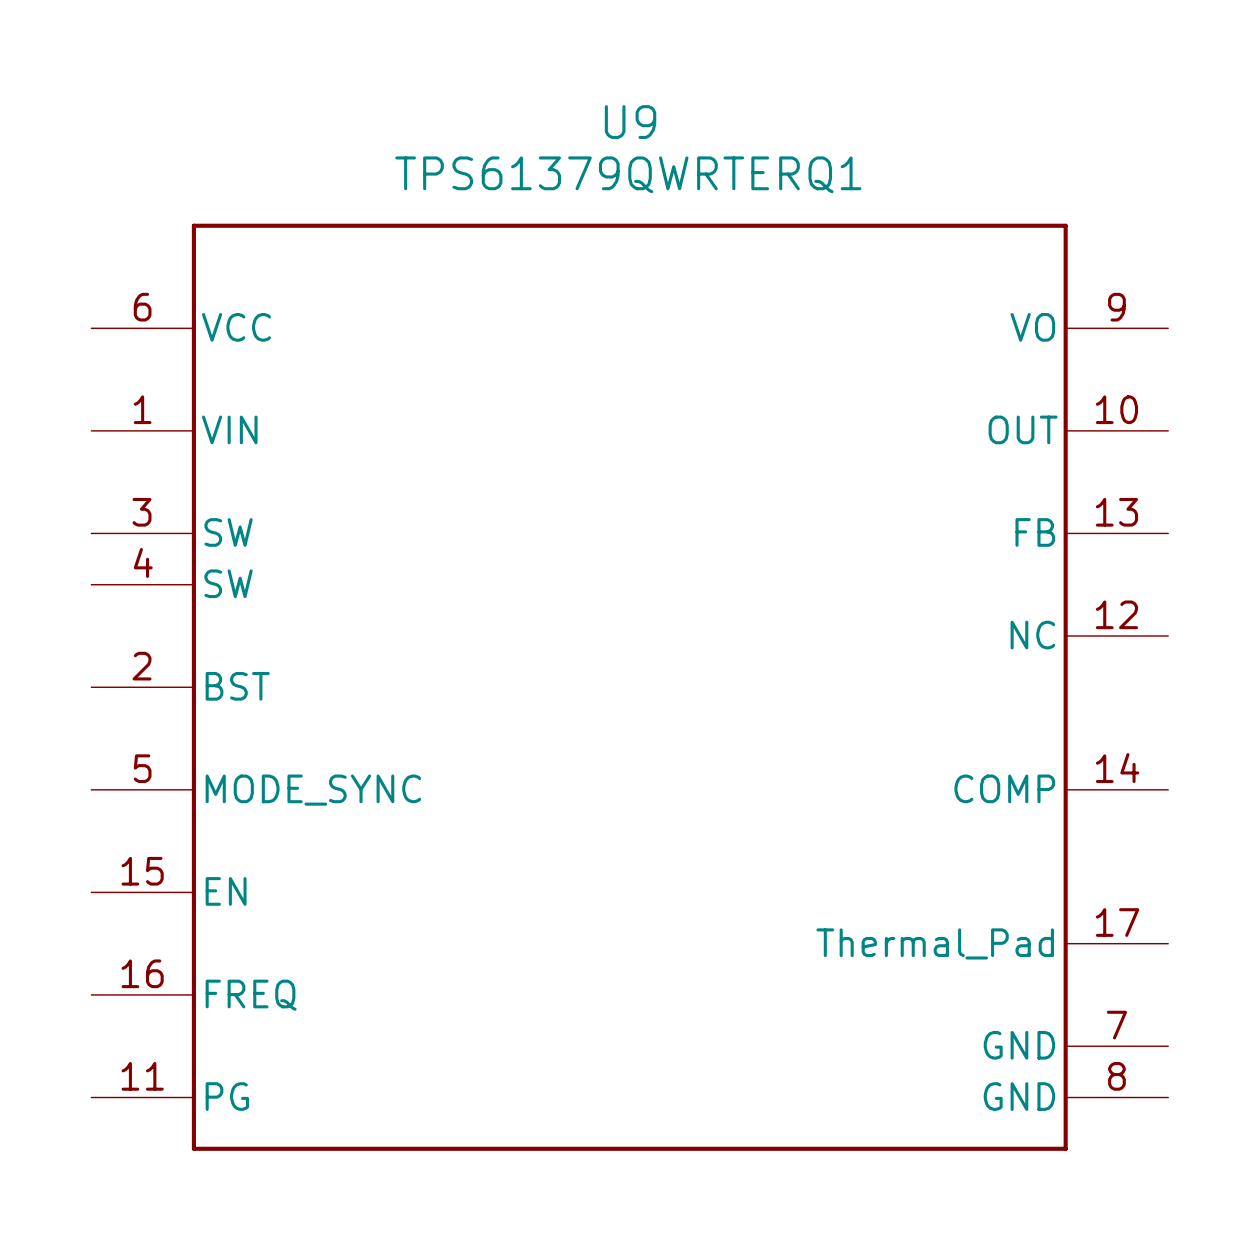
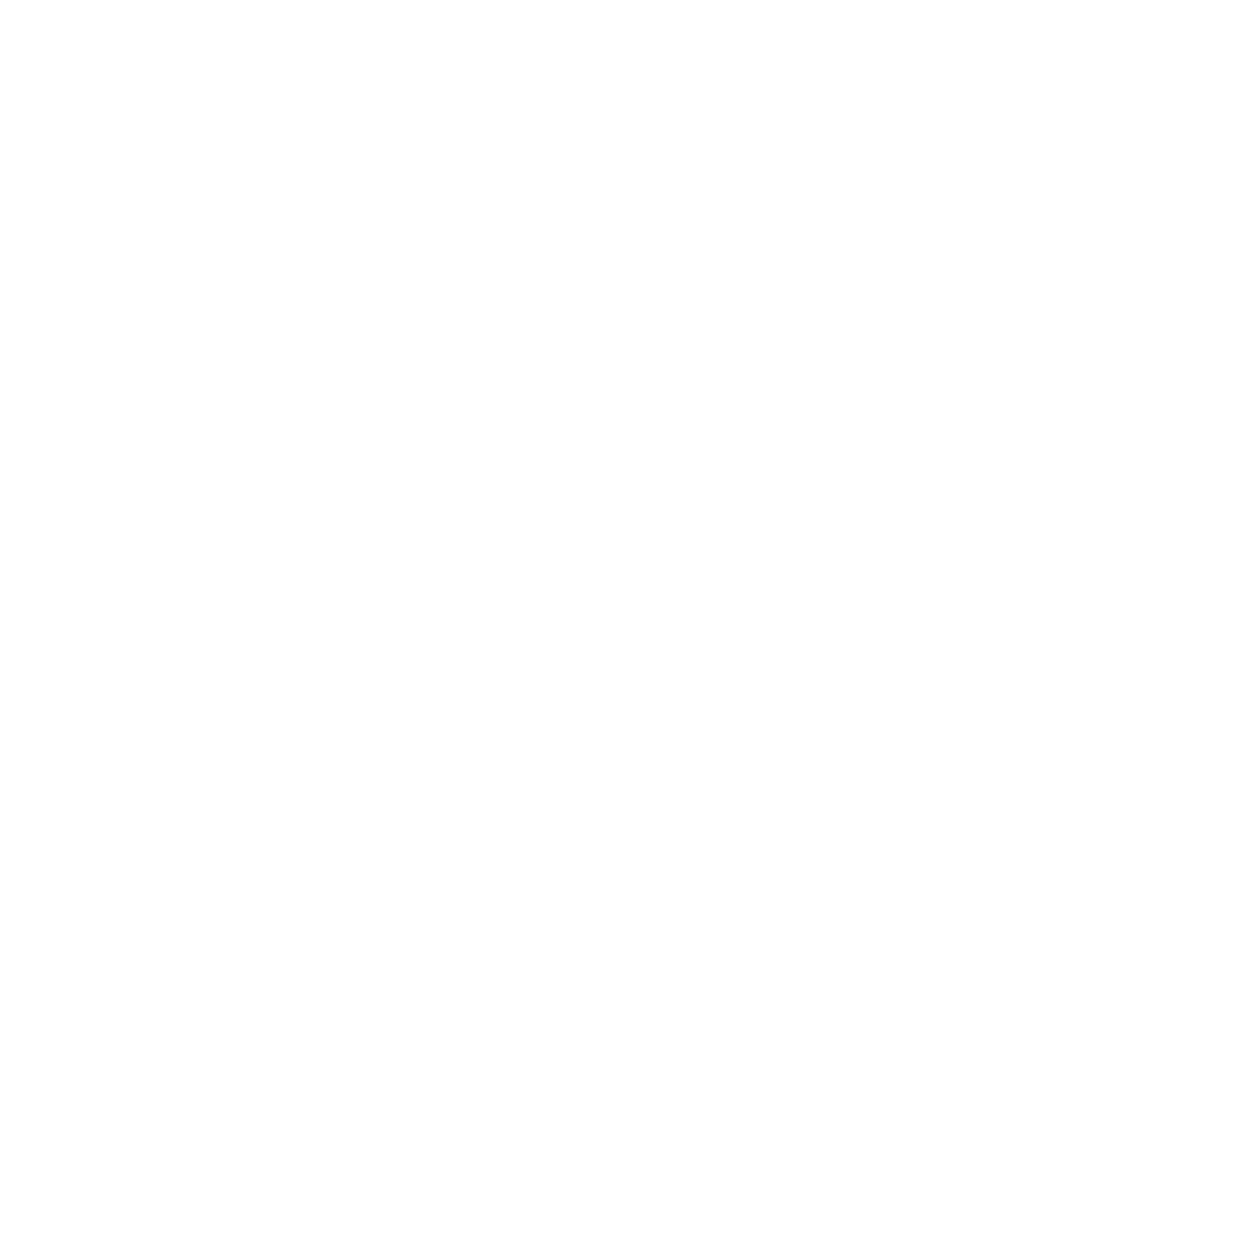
U9: TPS61379QWRTERQ1 (629, 687) -> none

